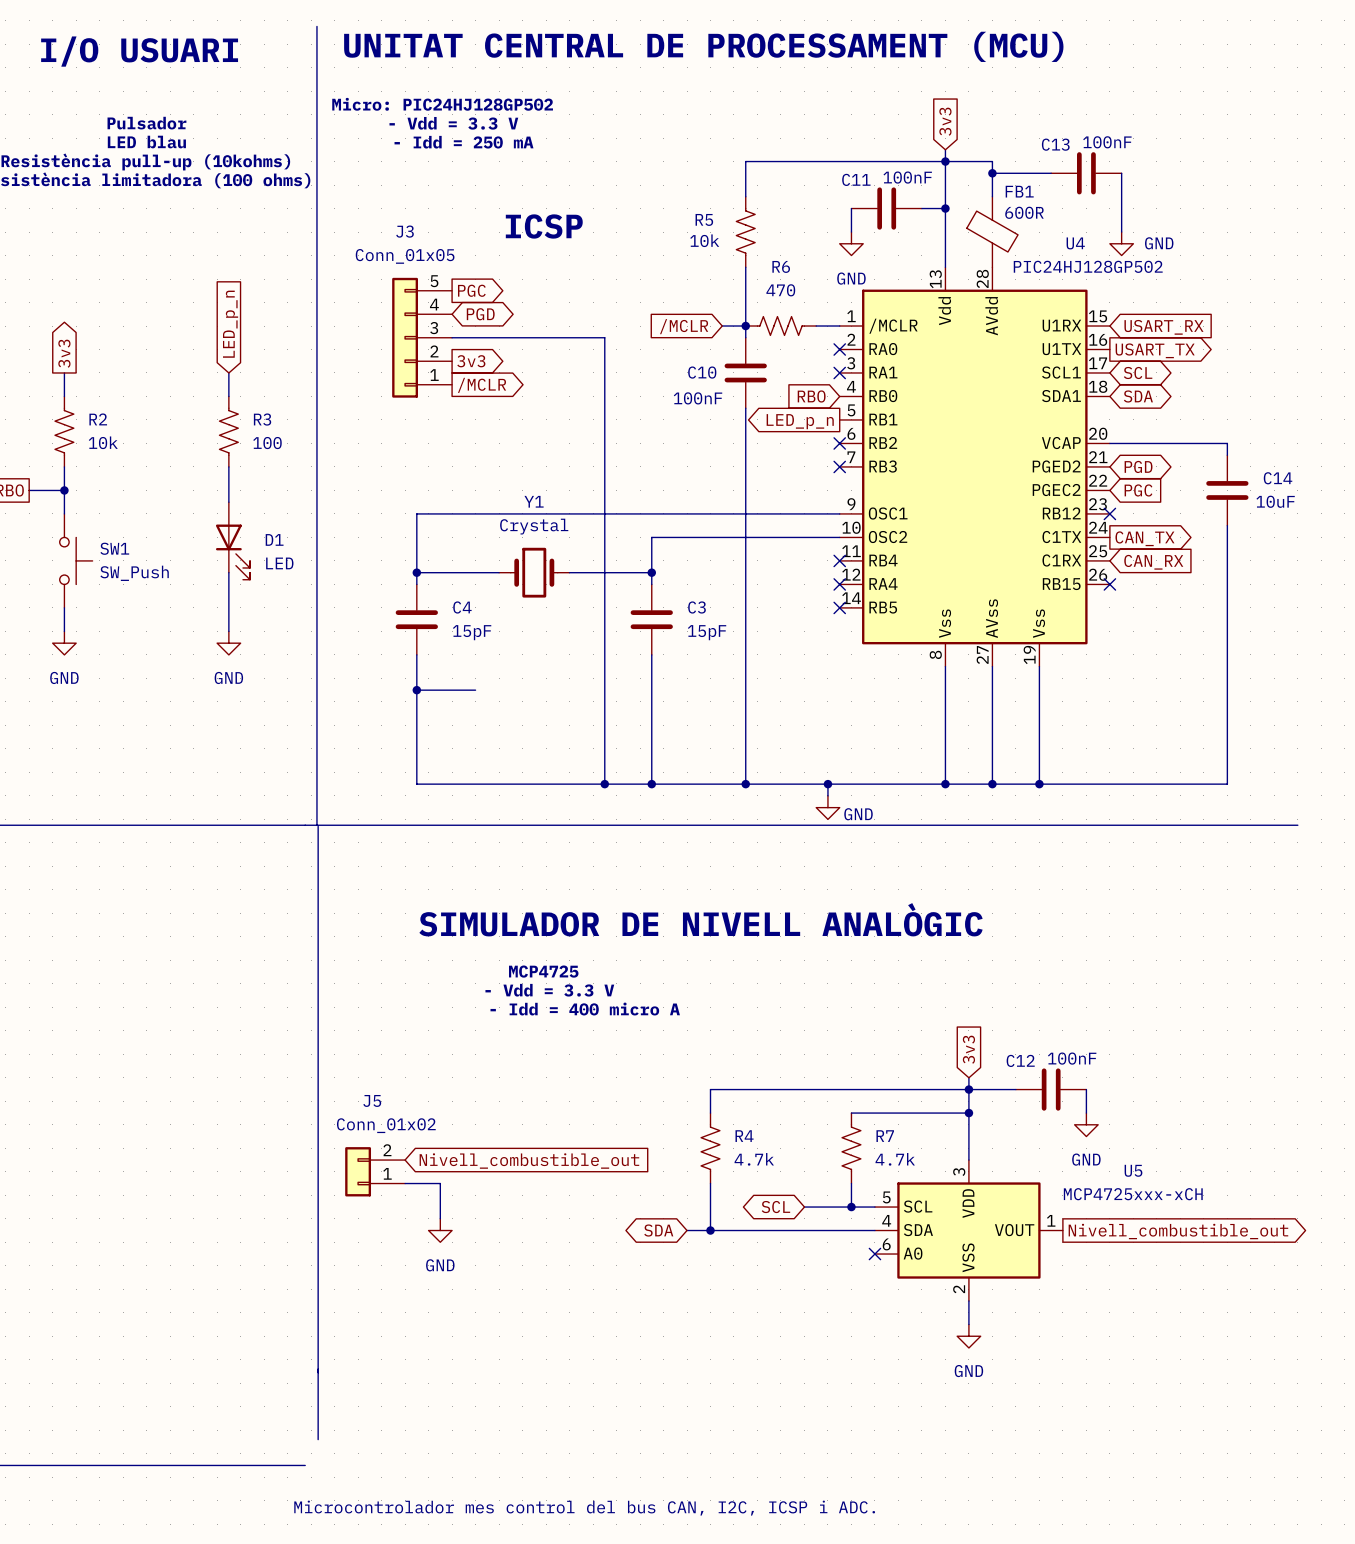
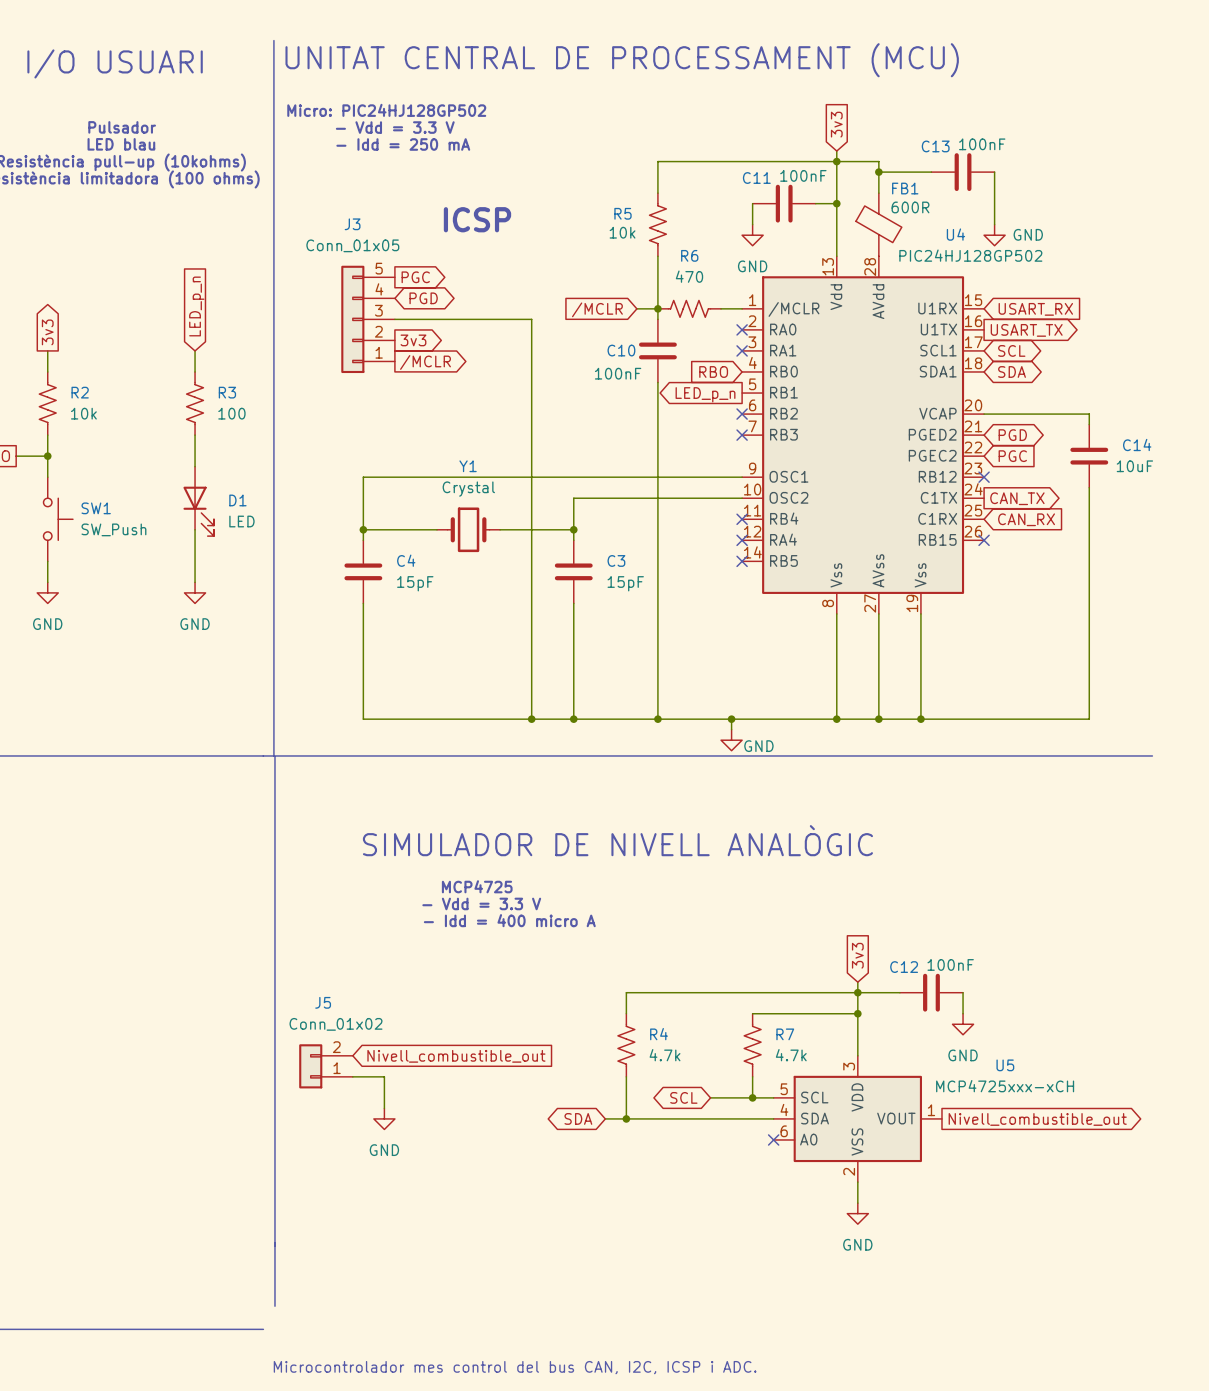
wire: (416, 690) (475, 690) -> none
junction: (416, 690) -> none

